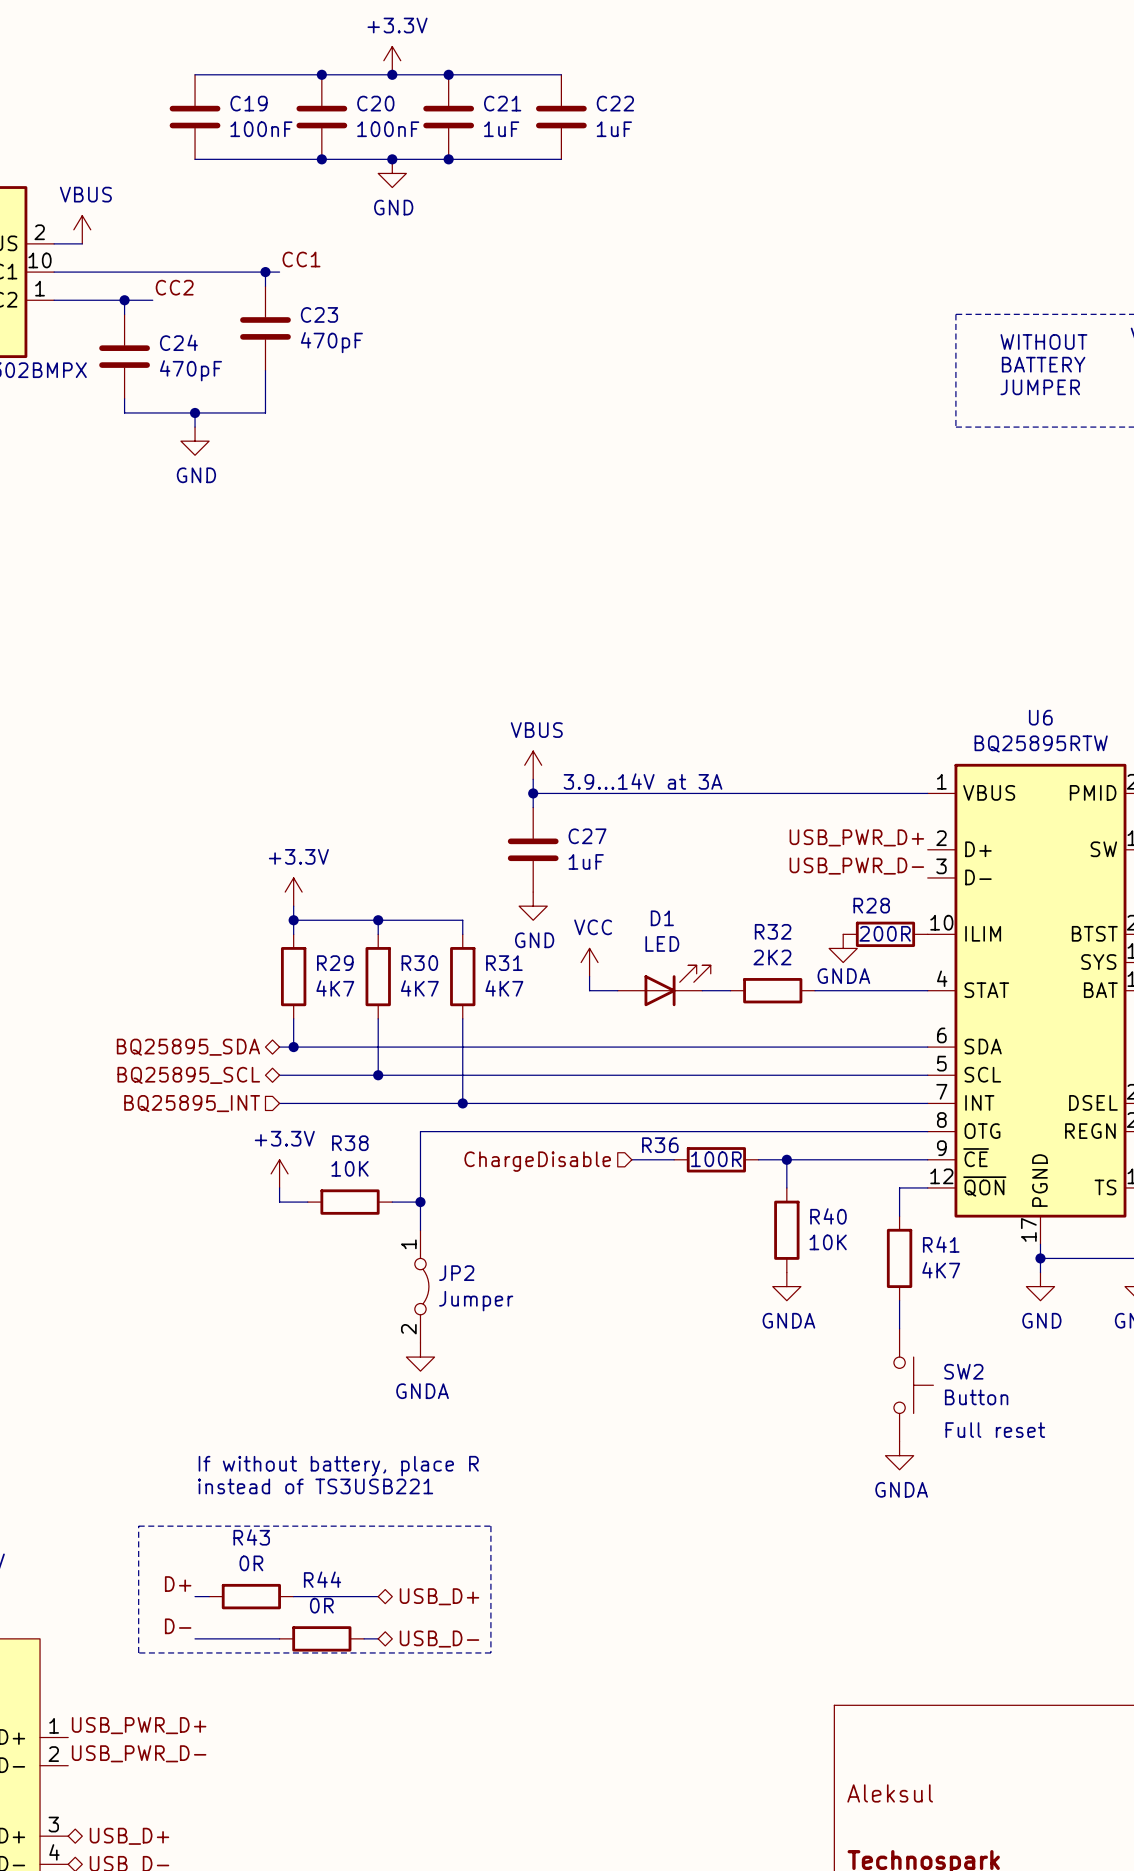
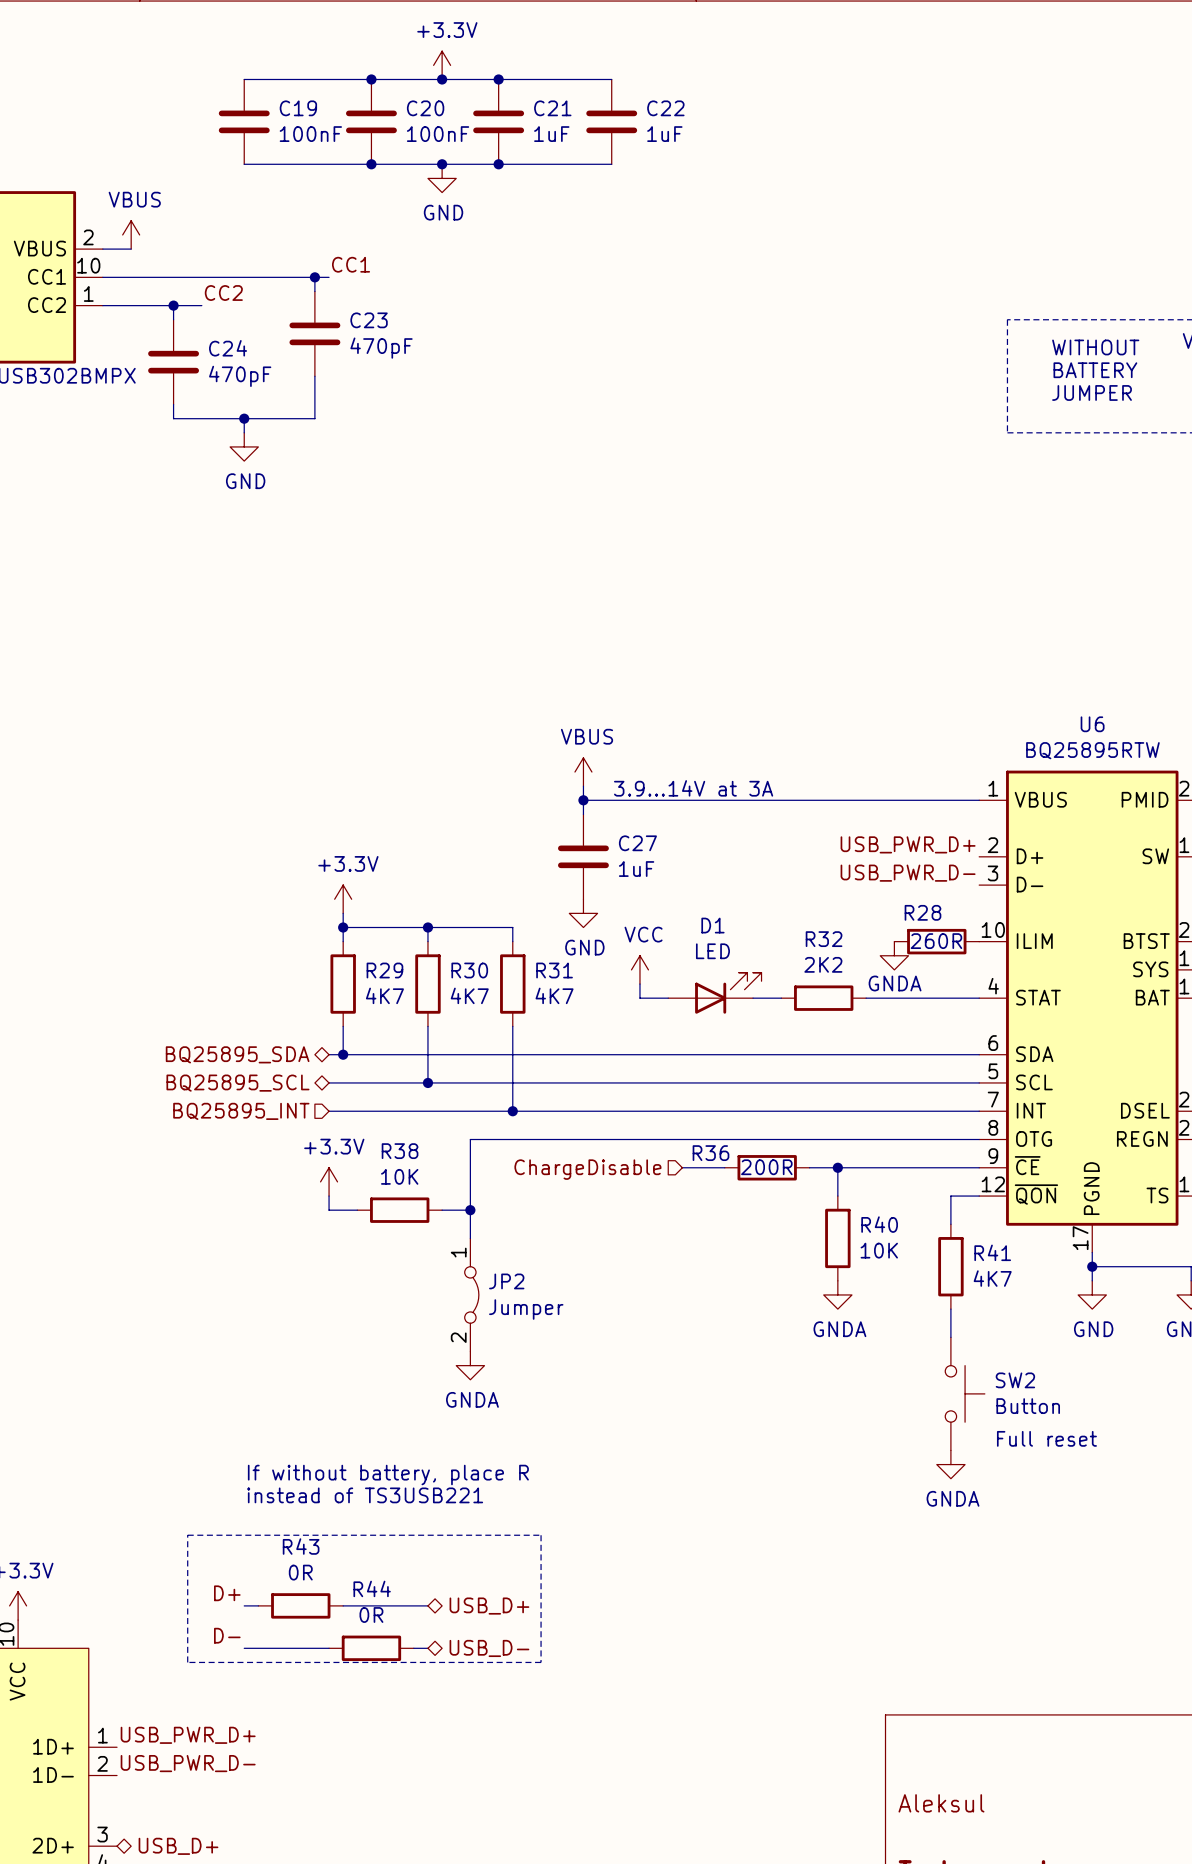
R28 value: 200R (885, 933) -> 260R (936, 941)
R36 value: 100R (716, 1159) -> 200R (766, 1167)

